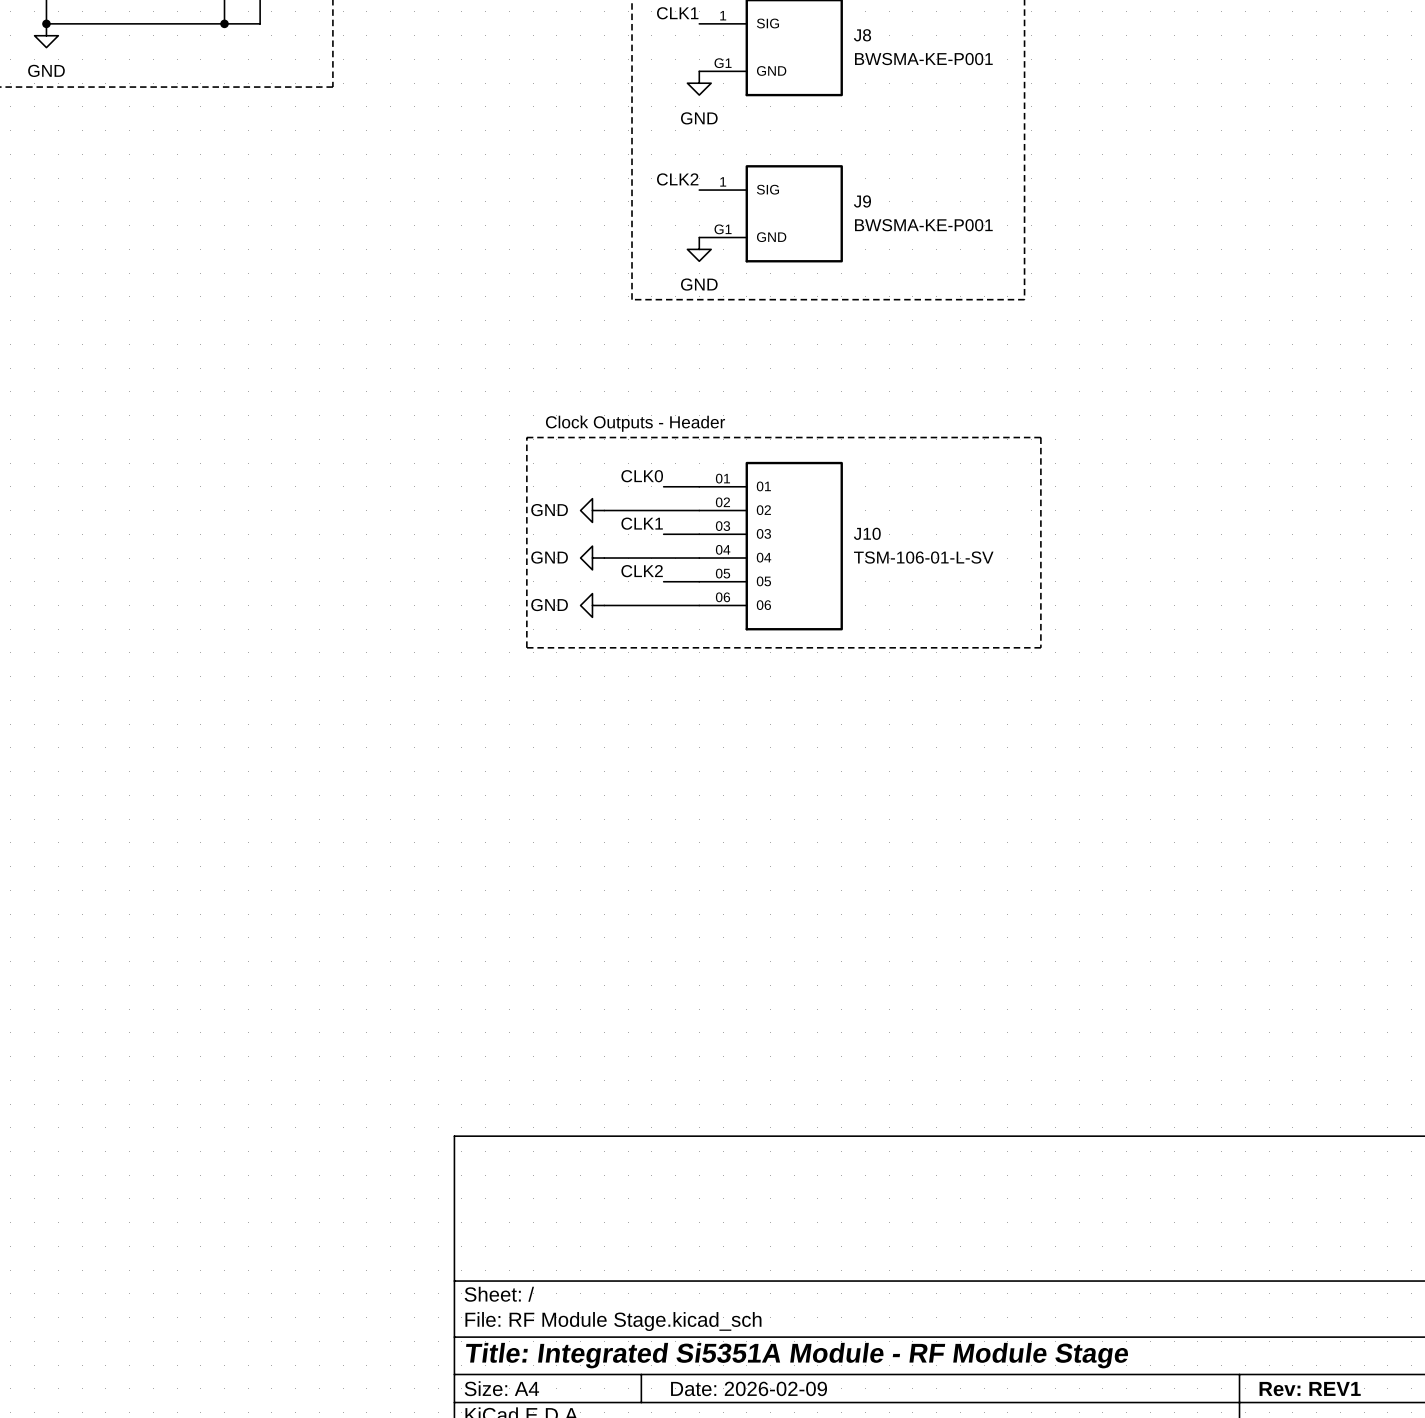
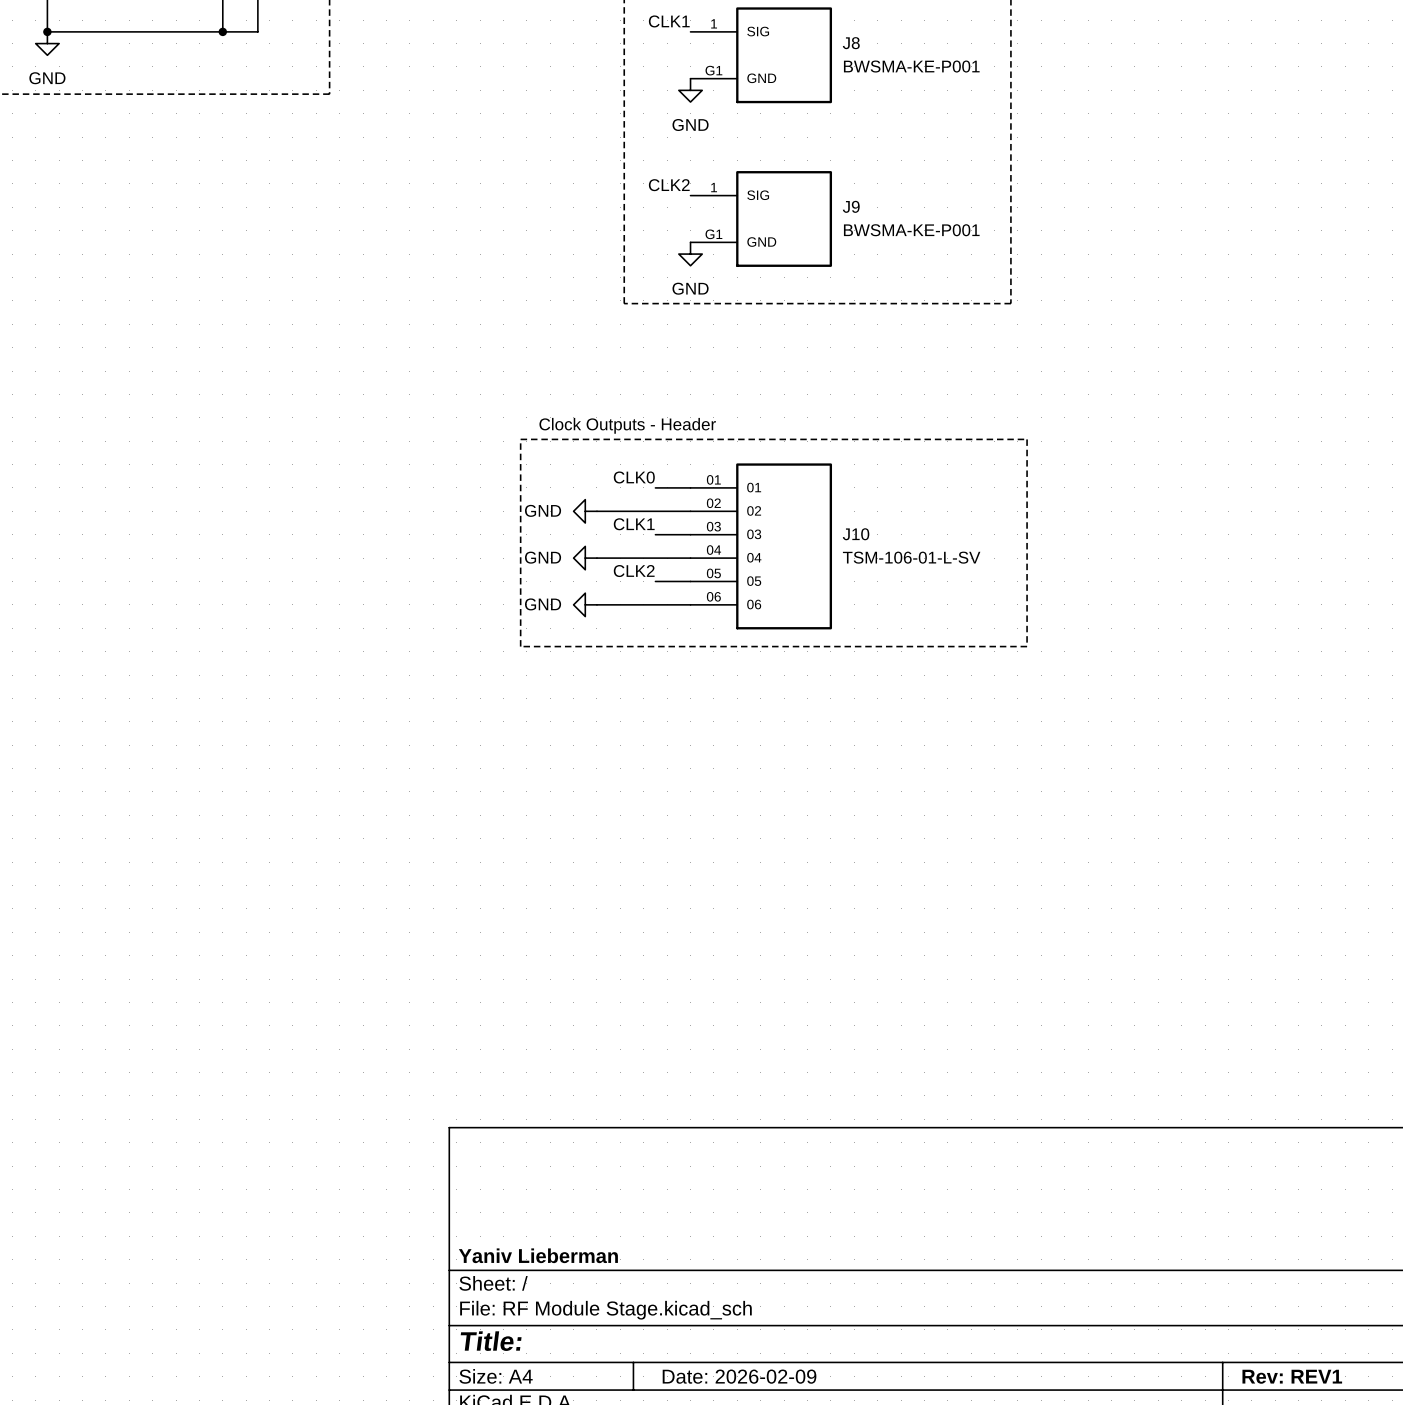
title block: none -> Yaniv Lieberman (538, 1255)
title block: Title: Integrated Si5351A Module - RF Module Stage (797, 1355) -> Title: (491, 1341)

